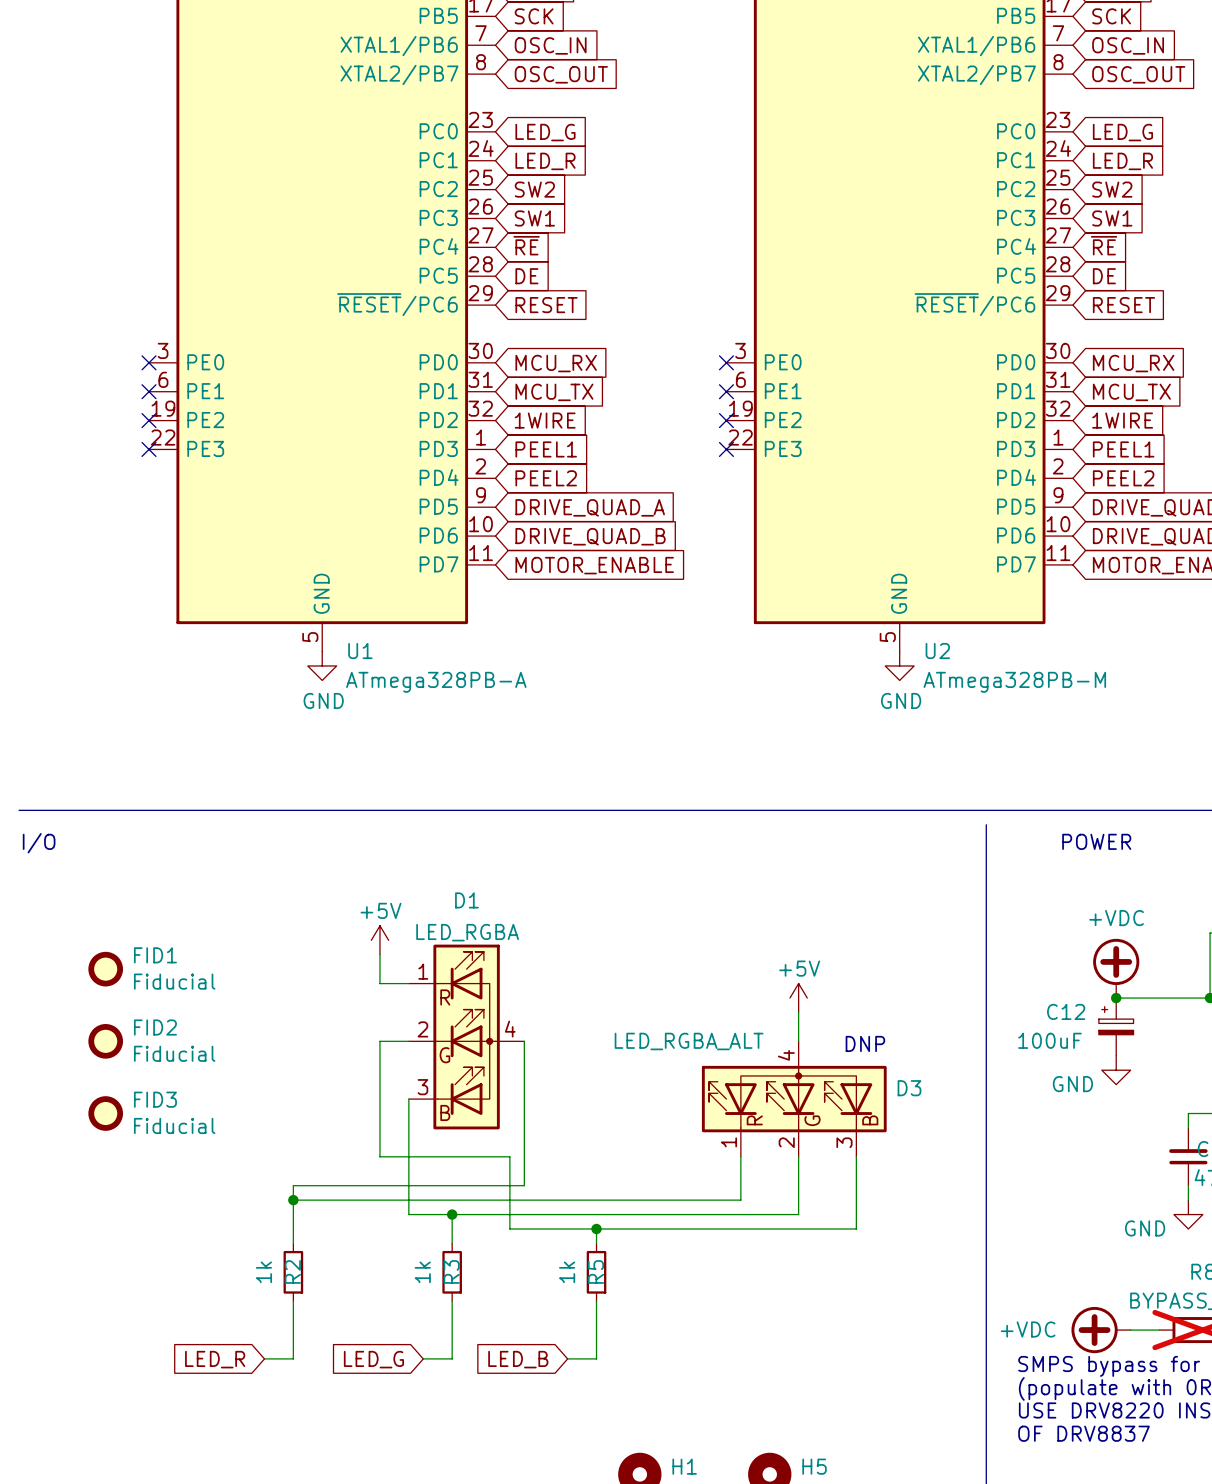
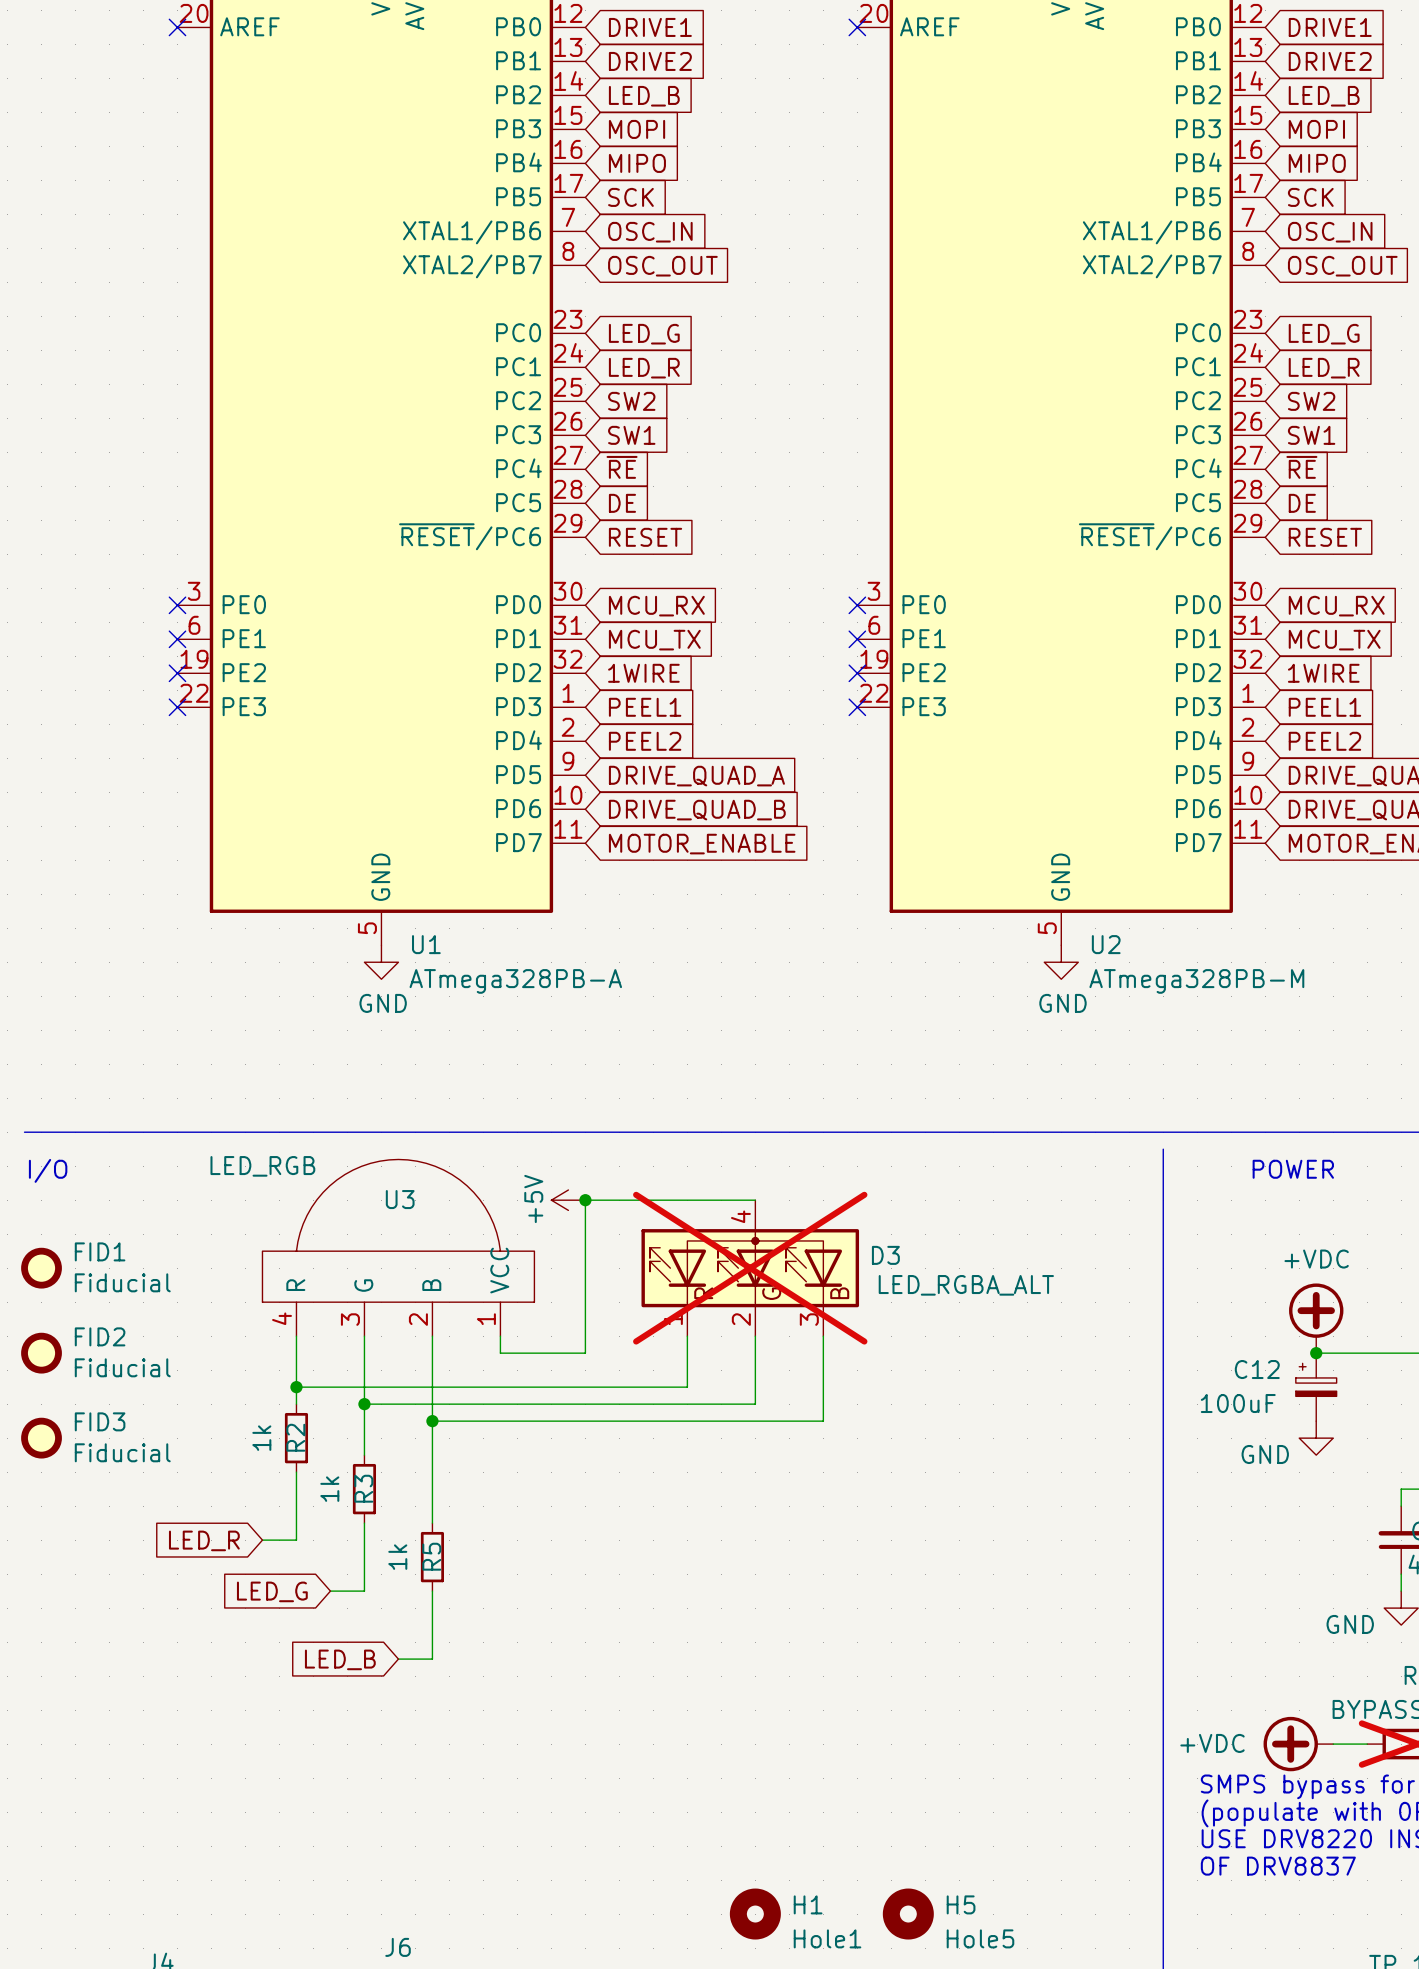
junction: none -> (585, 1200)
wire: none -> (755, 1200) (585, 1200) (585, 1353) (500, 1353) (500, 1336)
U3: none -> LED_RGB (398, 1247)
D3 do-not-place cross: none -> (750, 1268)
power symbol rotation: 0° (379, 940) -> 90° counterclockwise (568, 1200)
power symbol position: +5V (379, 940) -> +5V (568, 1200)
wire: (379, 954) (379, 983) (408, 983) -> none
FID1 position: (105, 969) -> (41, 1268)
wire: none -> (296, 1336) (296, 1404)
wire: none -> (364, 1336) (364, 1455)
wire: none -> (432, 1336) (432, 1523)
wire: none -> (687, 1336) (687, 1387) (296, 1387)
wire: none -> (755, 1336) (755, 1404) (483, 1404)
wire: none -> (823, 1336) (823, 1421) (432, 1421)
power symbol: +5V (798, 998) -> none
wire: (798, 1012) (798, 1041) -> none
junction: none -> (296, 1387)
D1: LED_RGBA (466, 1037) -> none
FID2 position: (105, 1041) -> (41, 1353)
junction: none -> (364, 1404)
wire: (379, 1041) (379, 1156) (509, 1156) (509, 1229) (856, 1229) (856, 1156) -> (449, 1404) (364, 1404)
wire: (524, 1041) (524, 1185) (293, 1185) (293, 1243) -> none
D3 value position: LED_RGBA_ALT (689, 1041) -> LED_RGBA_ALT (966, 1285)
text: DNP (865, 1043) -> none
junction: none -> (432, 1421)
wire: none -> (296, 1472) (296, 1540) (262, 1540)
wire: (408, 1099) (408, 1214) (798, 1214) (798, 1156) -> none
D3 position: (794, 1099) -> (750, 1268)
FID3 position: (105, 1113) -> (41, 1438)
wire: (740, 1156) (740, 1200) (307, 1200) -> (364, 1523) (364, 1591)
wire: none -> (330, 1591) (347, 1591)
junction: (293, 1200) -> none
wire: (452, 1214) (452, 1243) -> none
junction: (452, 1214) -> none
wire: (596, 1229) (596, 1243) -> none
junction: (596, 1229) -> none
R2 position: (293, 1272) -> (296, 1438)
R3 position: (452, 1272) -> (364, 1489)
R5 position: (596, 1272) -> (432, 1557)
wire: (293, 1301) (293, 1358) (264, 1358) -> (432, 1591) (432, 1659) (398, 1659)
wire: (452, 1301) (452, 1358) (423, 1358) -> none
wire: (596, 1301) (596, 1358) (567, 1358) -> none
global label position: LED_R (215, 1359) -> LED_R (204, 1540)
global label position: LED_G (373, 1359) -> LED_G (272, 1591)
global label position: LED_B (518, 1359) -> LED_B (340, 1659)

